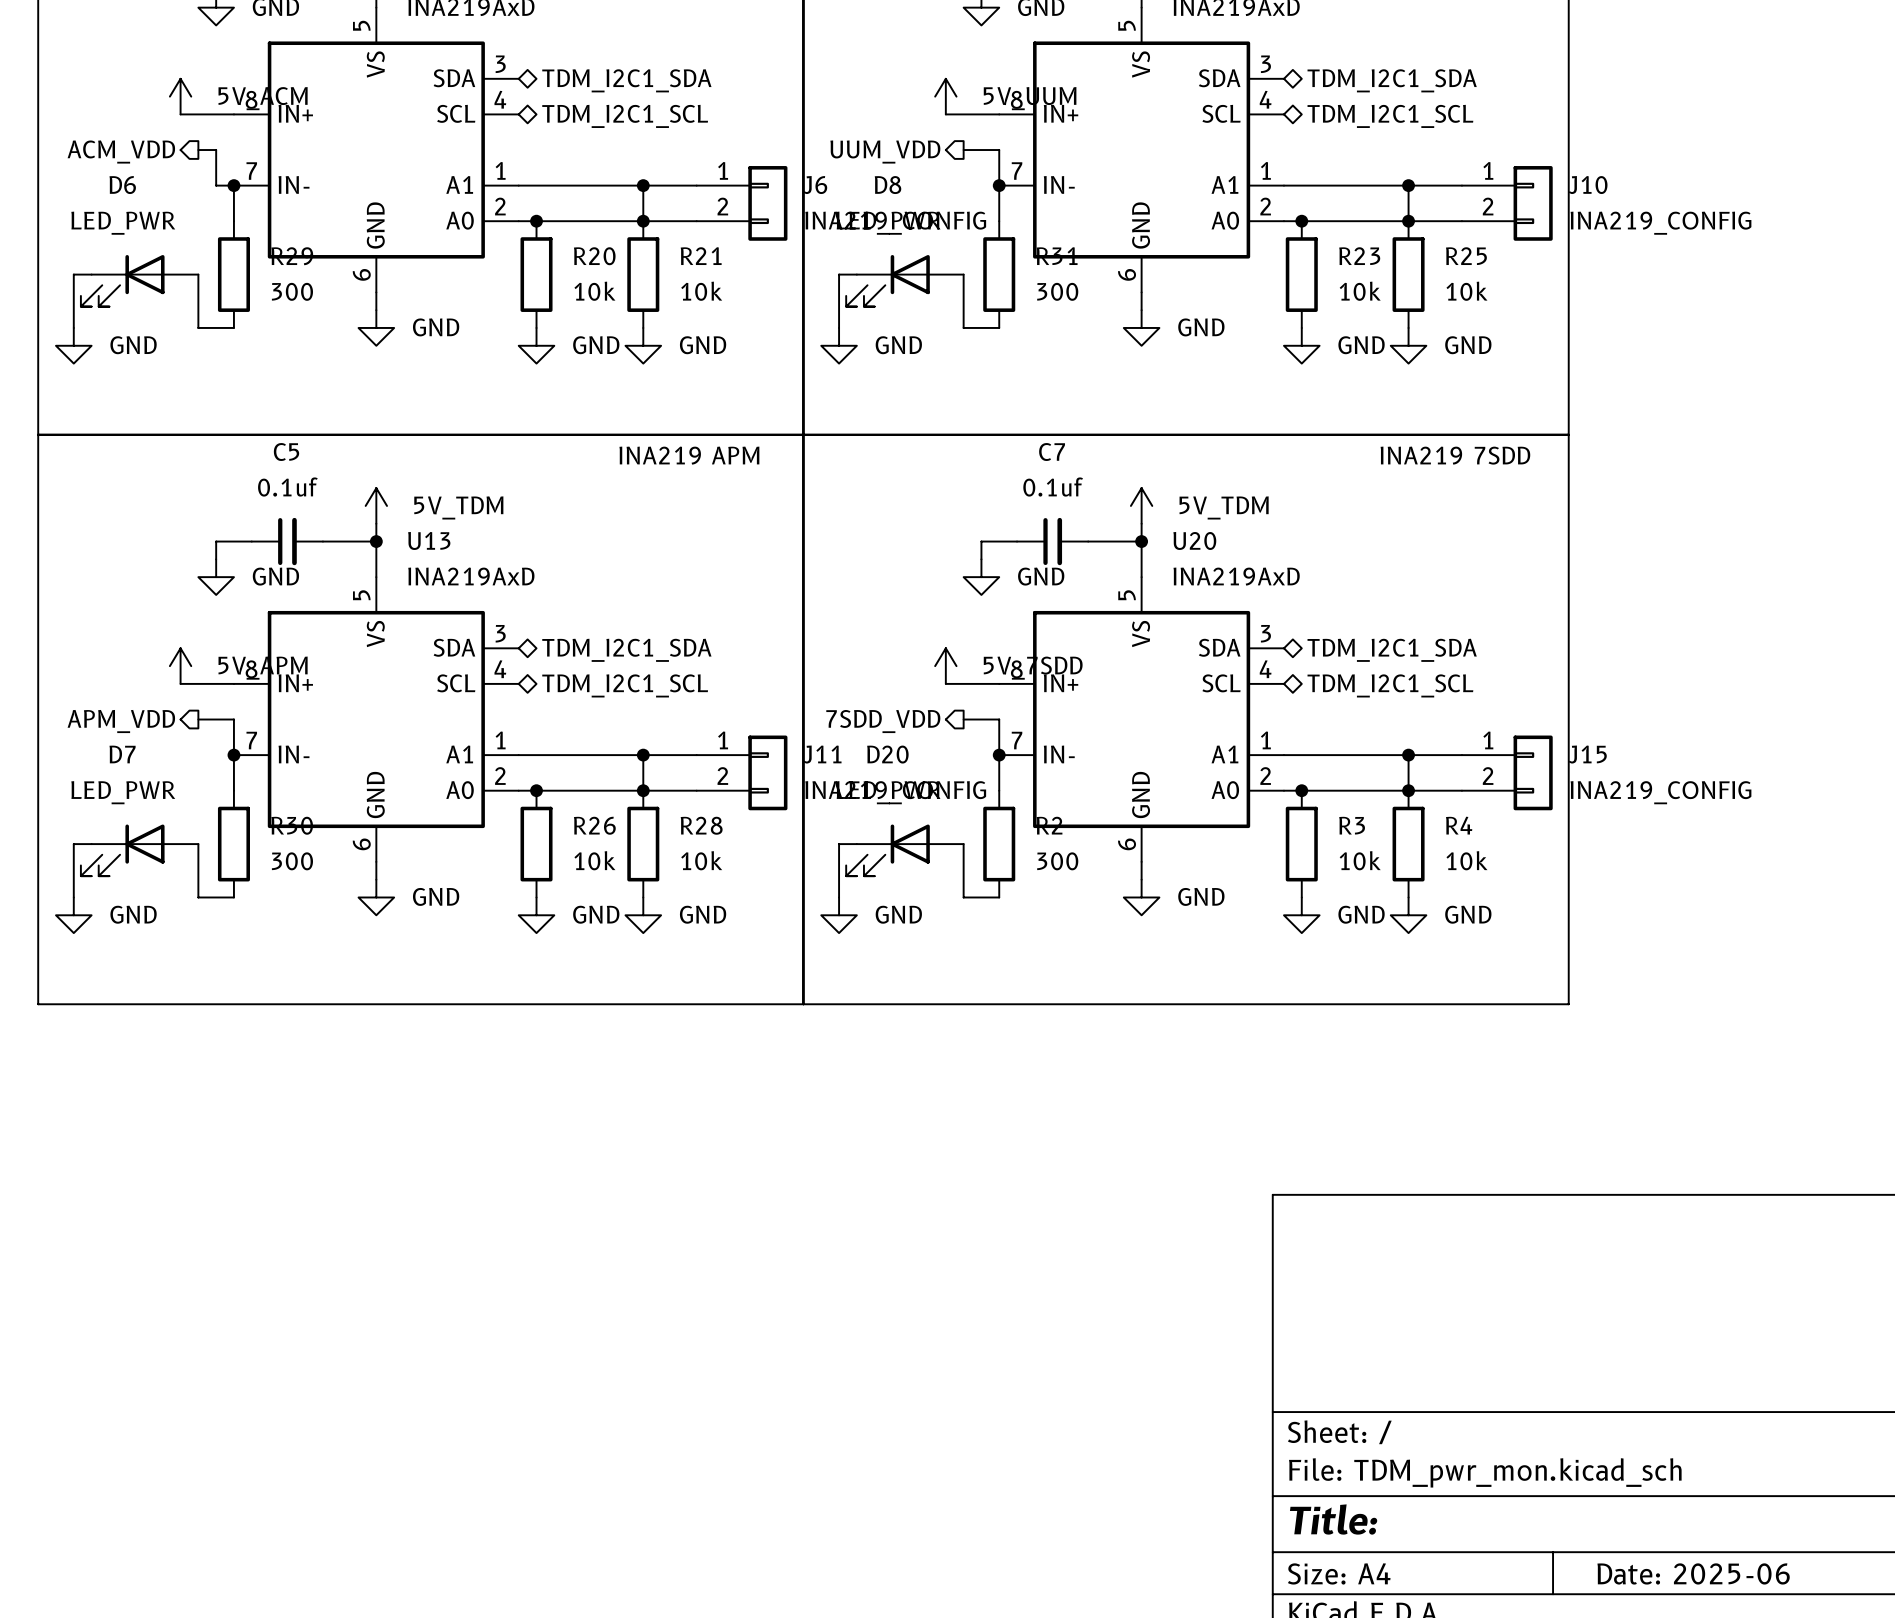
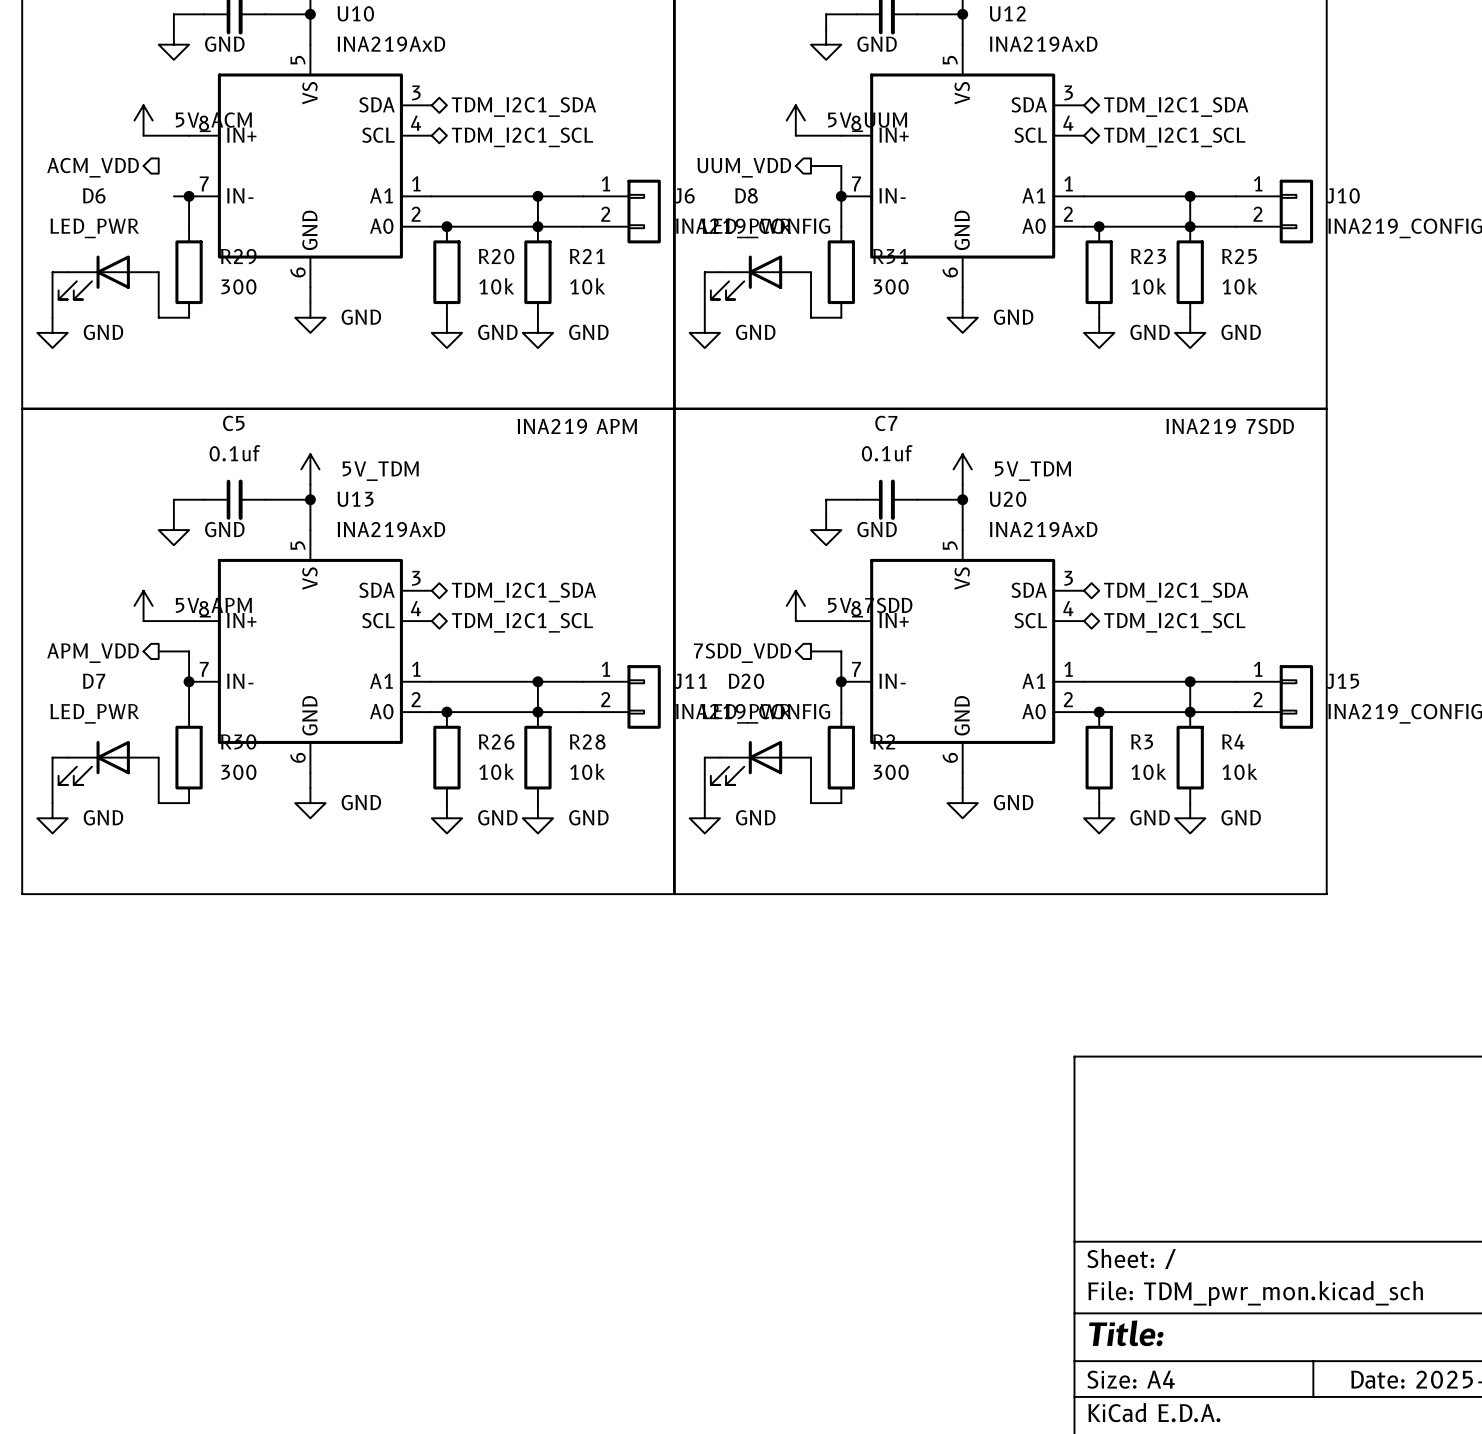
wire: (198, 150) (216, 150) (216, 185) -> none

